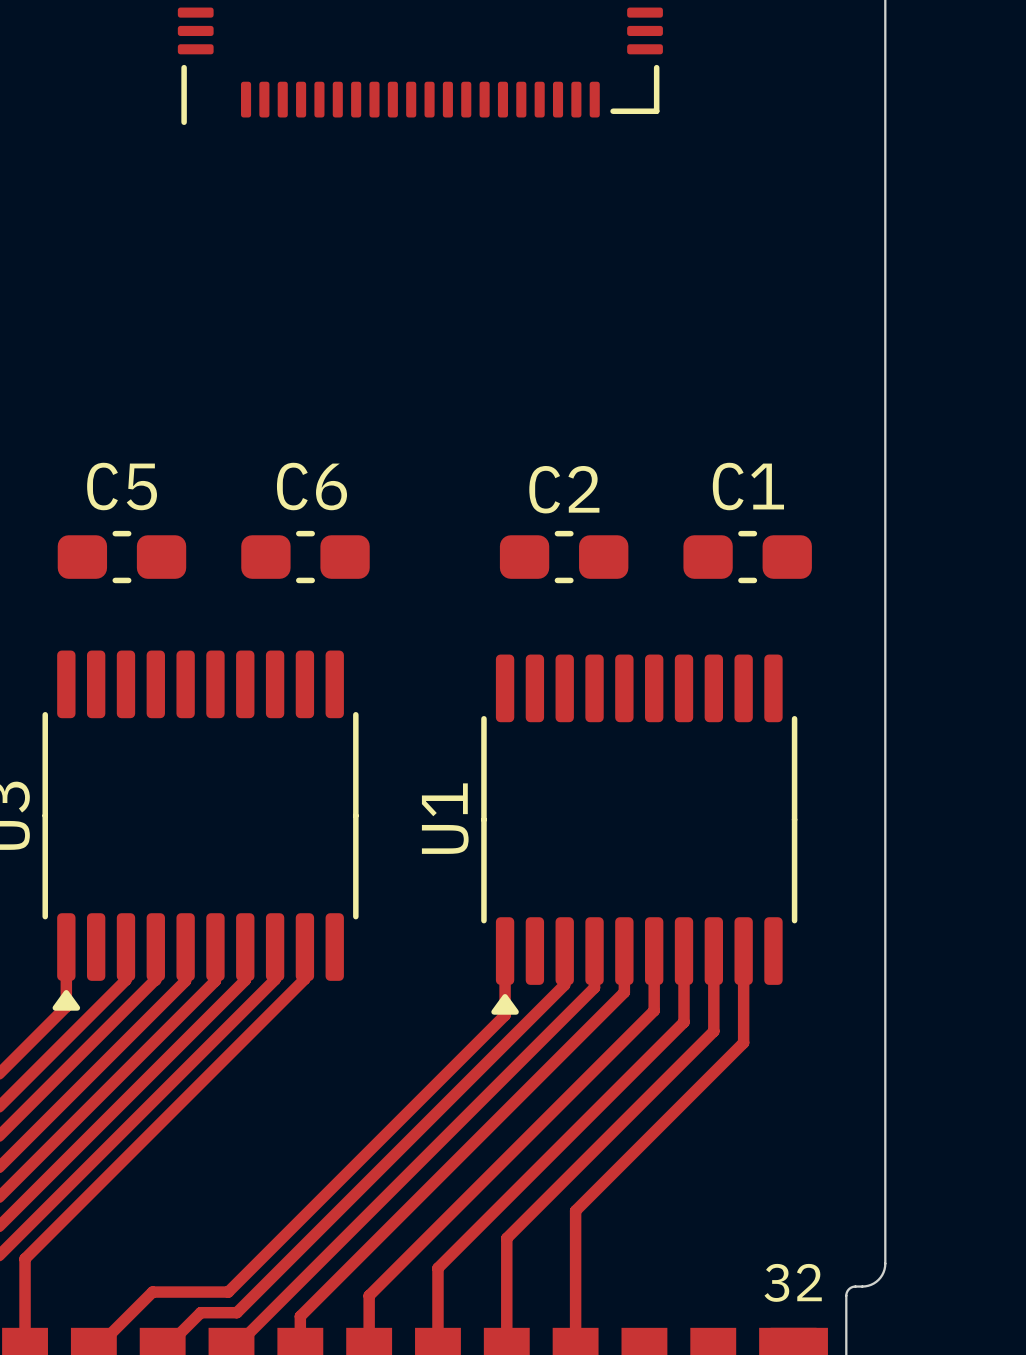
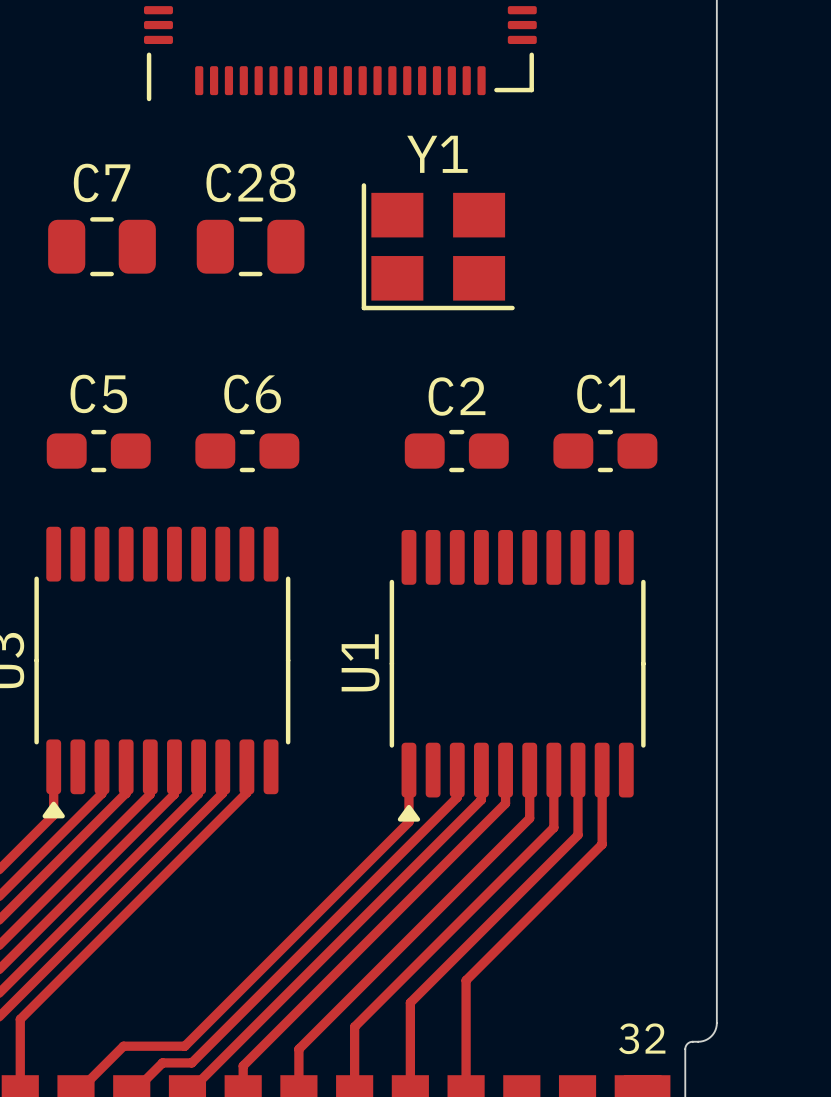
C7: none -> (102, 246)
C28: none -> (250, 246)
Y1: none -> (438, 246)

